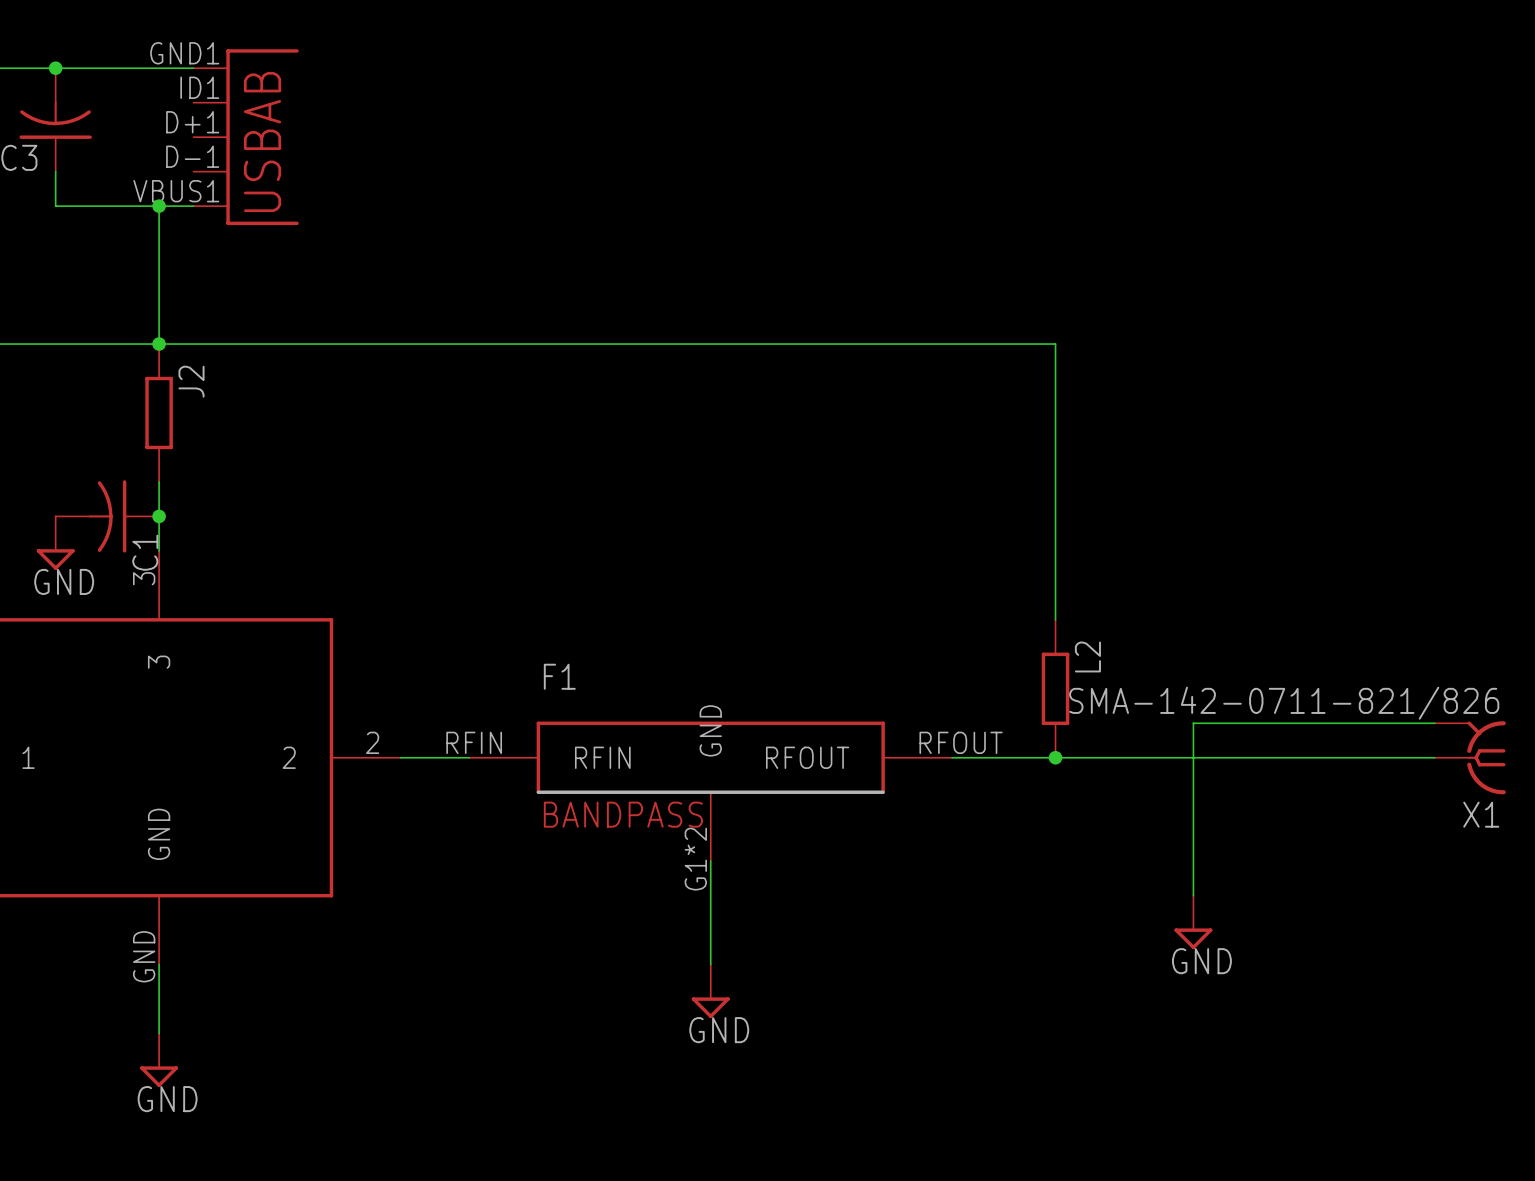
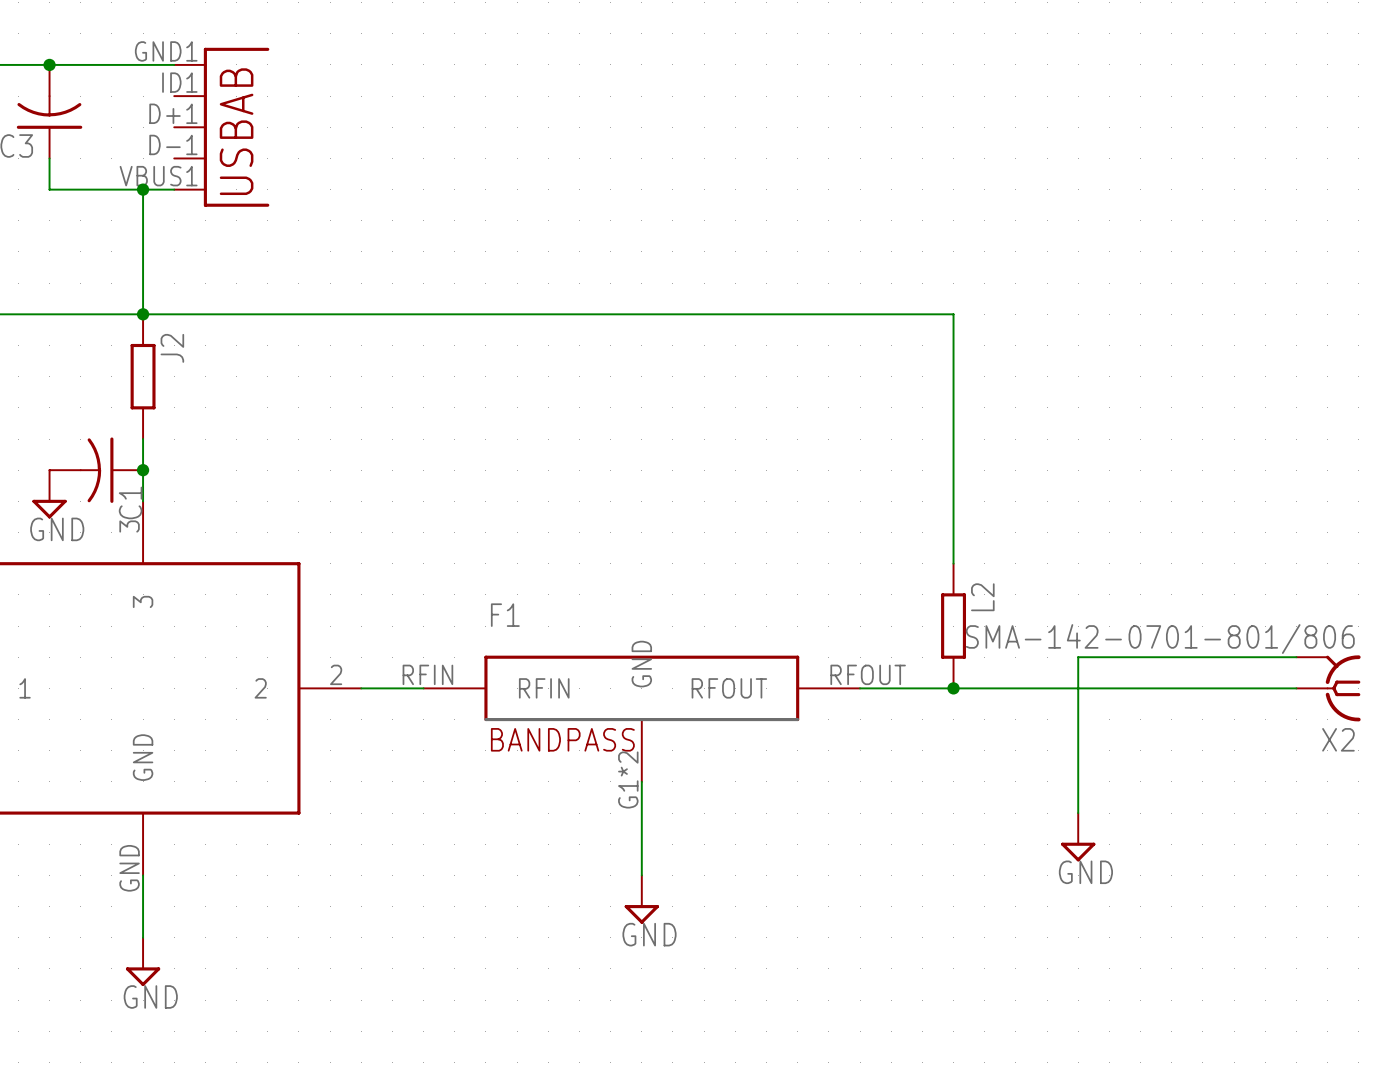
X1 value: SMA-142-0711-821/826 (1284, 703) -> SMA-142-0701-801/806 (1160, 639)
X1 name: X1 (1481, 814) -> X2 (1338, 739)

